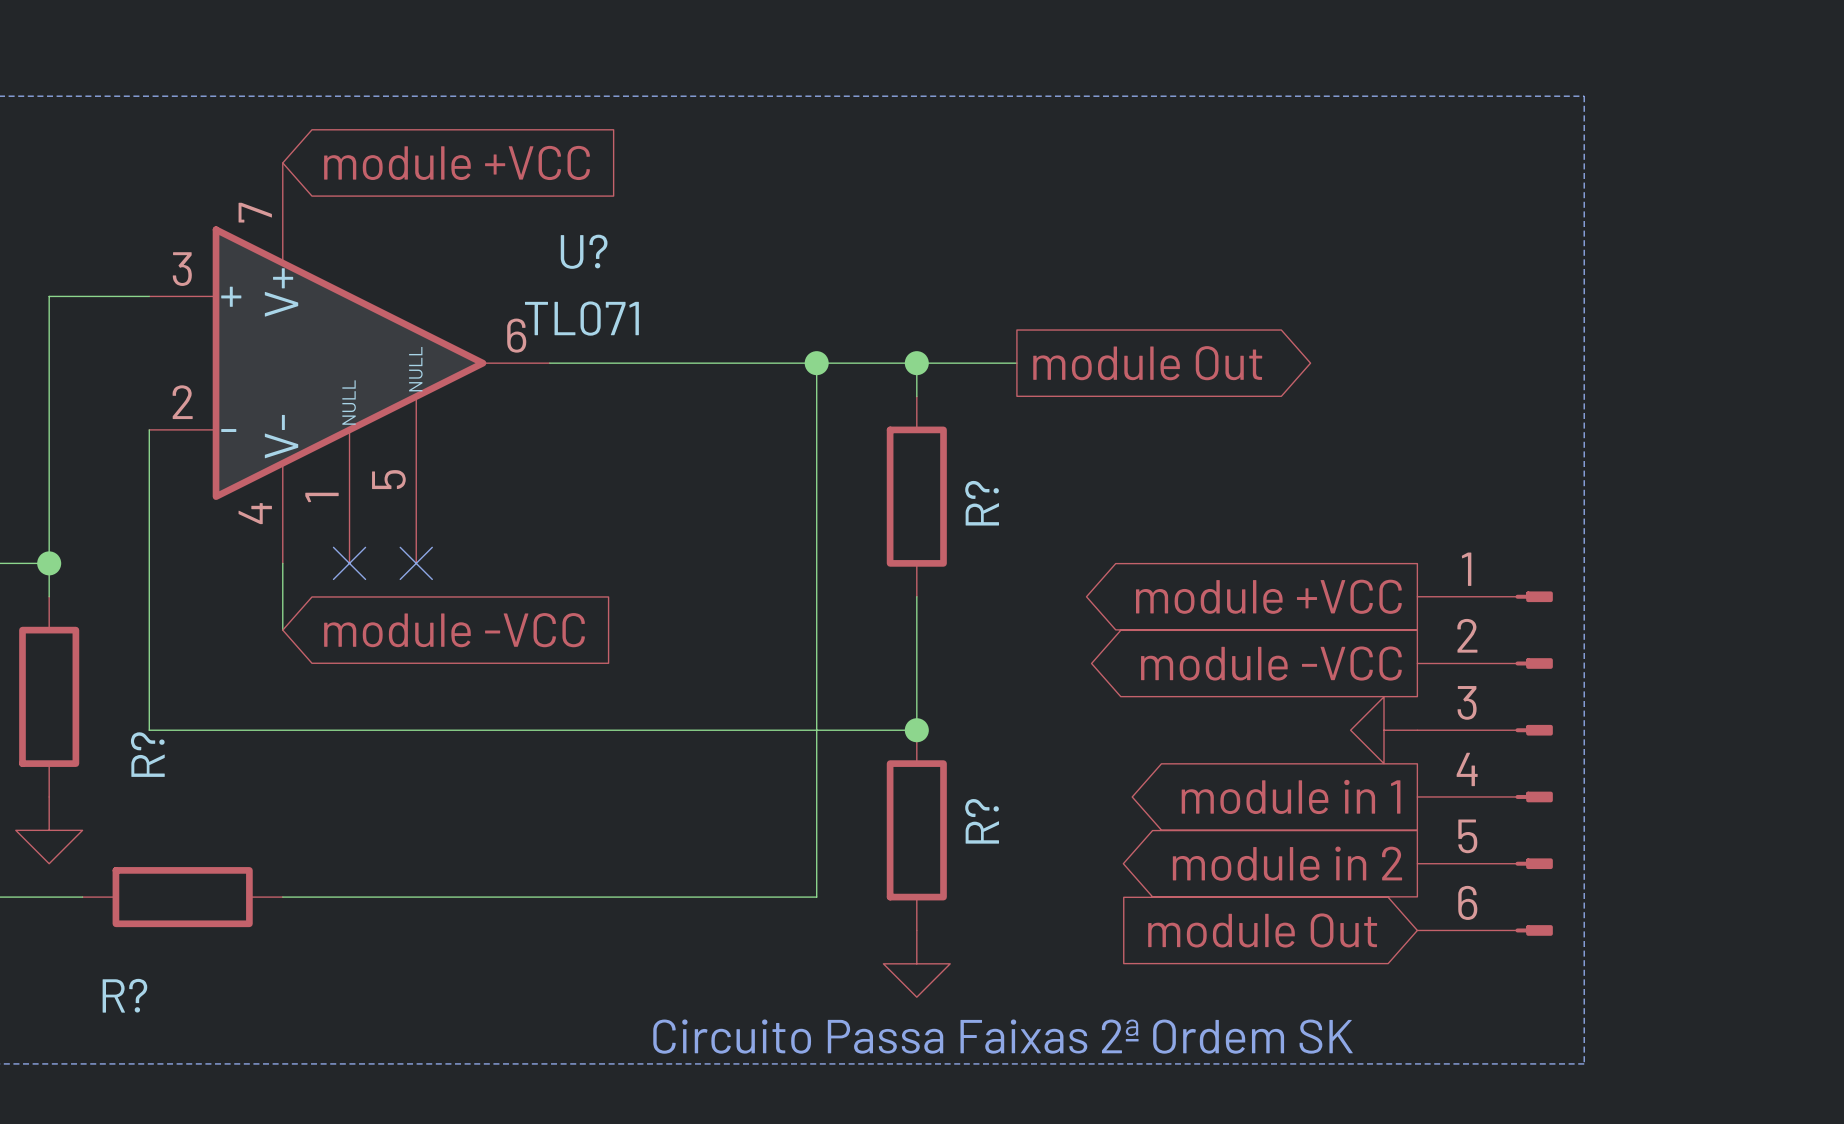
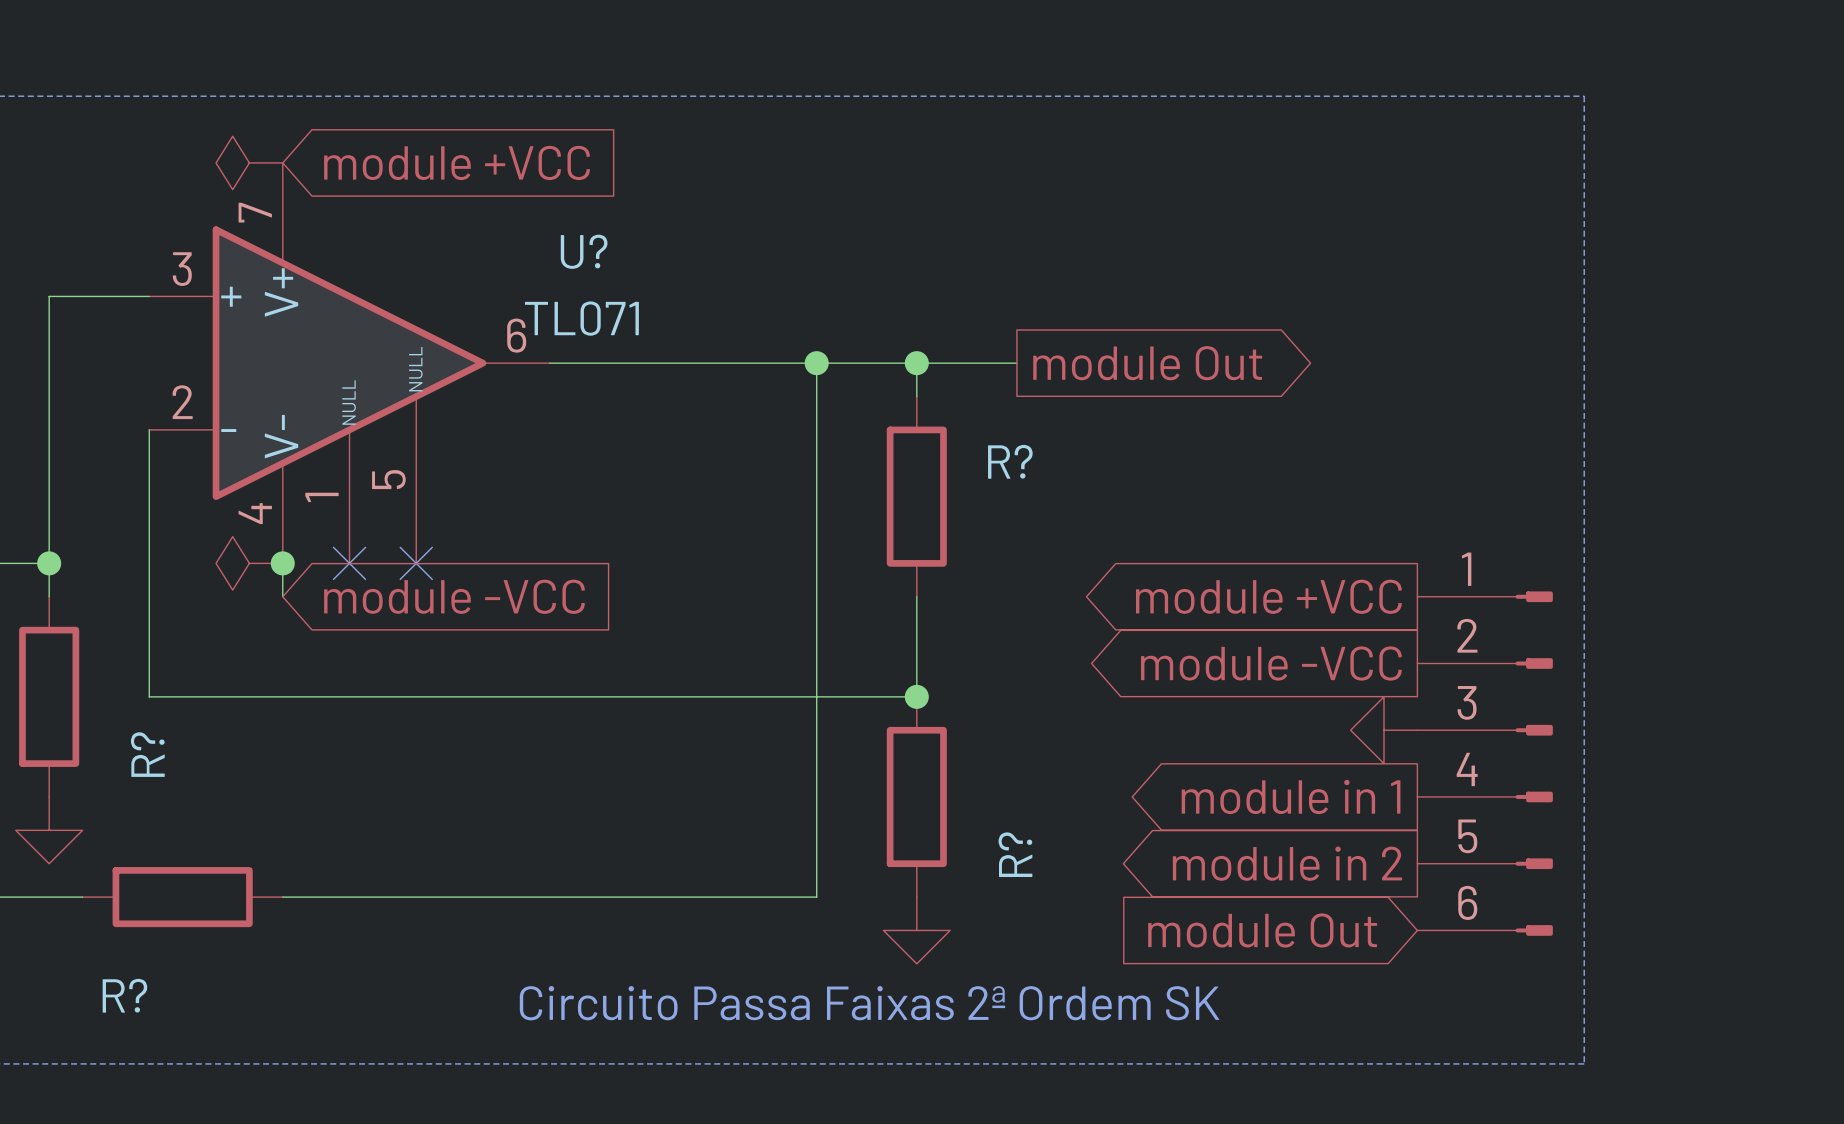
power symbol: none -> (249, 162)
R? name rotation: 0° (982, 503) -> 90° clockwise (1010, 461)
power symbol: none -> (249, 563)
junction: none -> (282, 563)
wire: (282, 596) (282, 630) -> none
global label position: module -VCC (454, 630) -> module -VCC (454, 596)
wire: (149, 696) (149, 730) (916, 730) (916, 696) -> (149, 696) (916, 696)
junction position: (916, 730) -> (916, 696)
R? name position: R? (982, 821) -> R? (1015, 854)
R? position: (916, 830) -> (916, 796)
power symbol position: (916, 963) -> (916, 930)
text position: Circuito Passa Faixas 2ª Ordem SK (1003, 1036) -> Circuito Passa Faixas 2ª Ordem SK (869, 1003)

